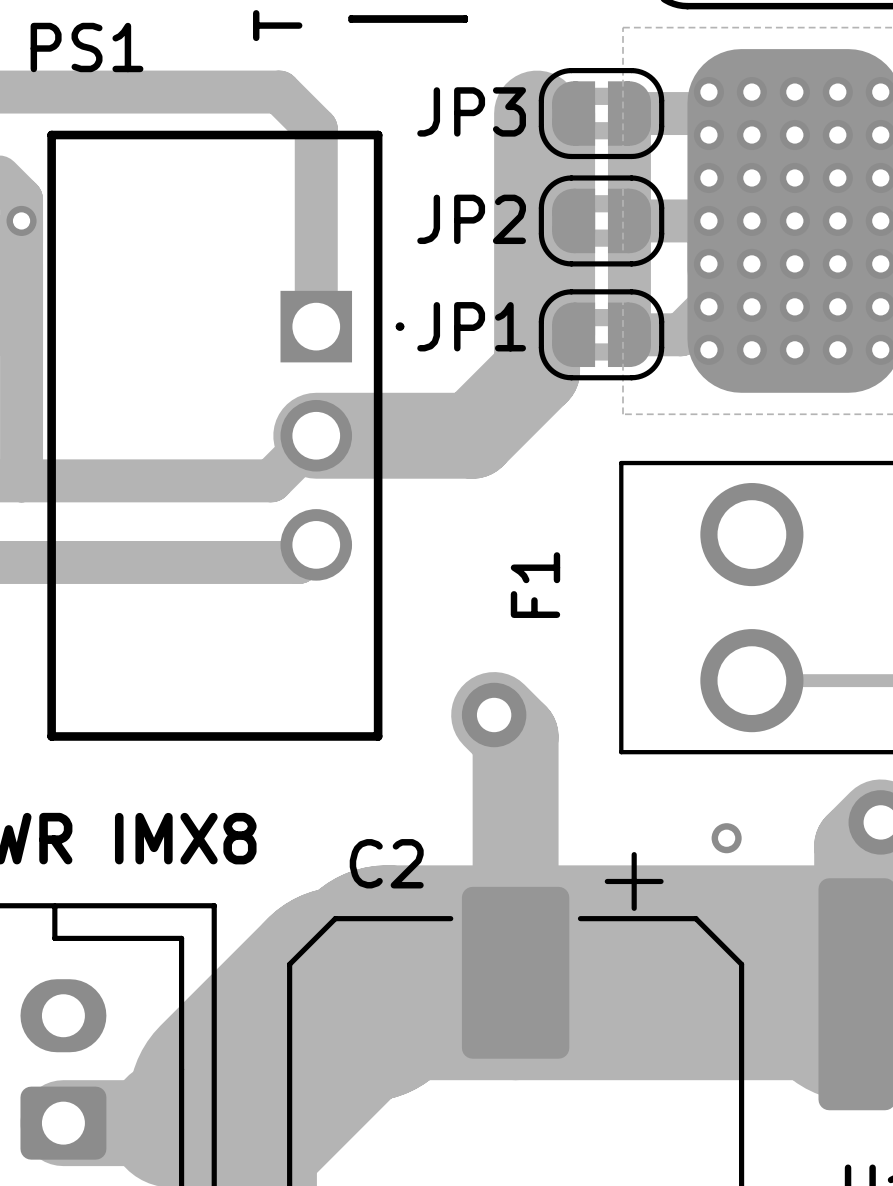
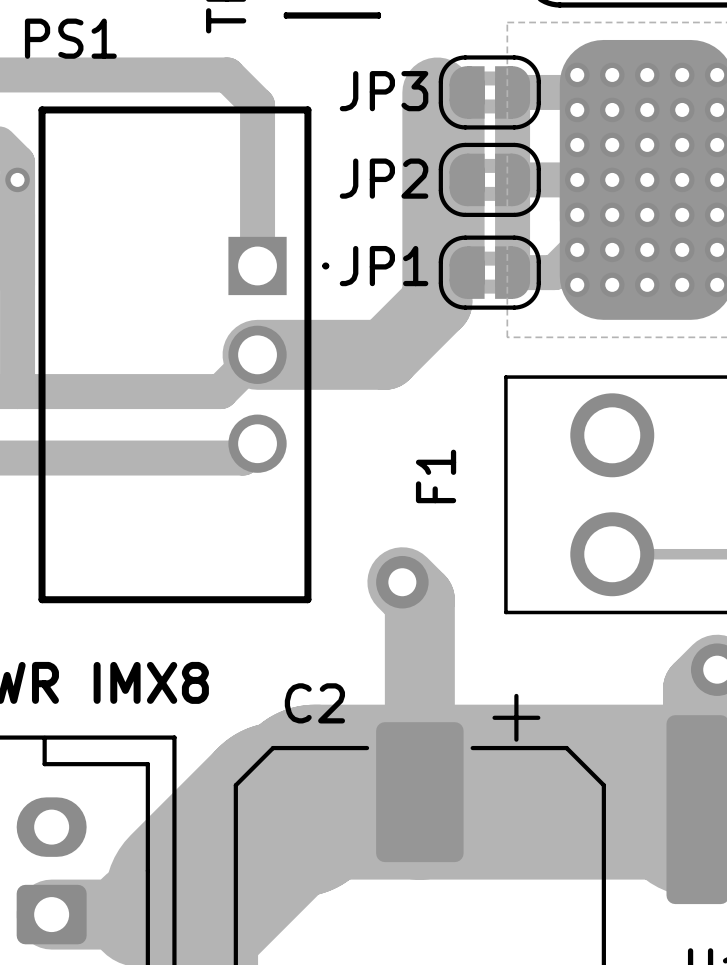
via: (726, 838) -> none

